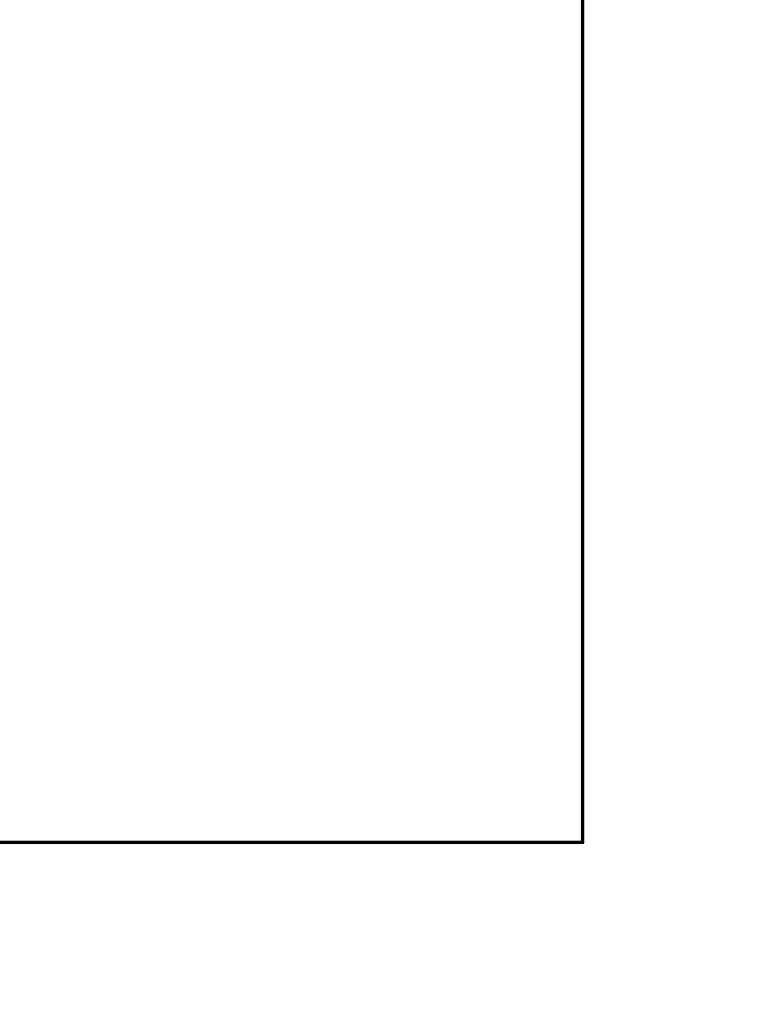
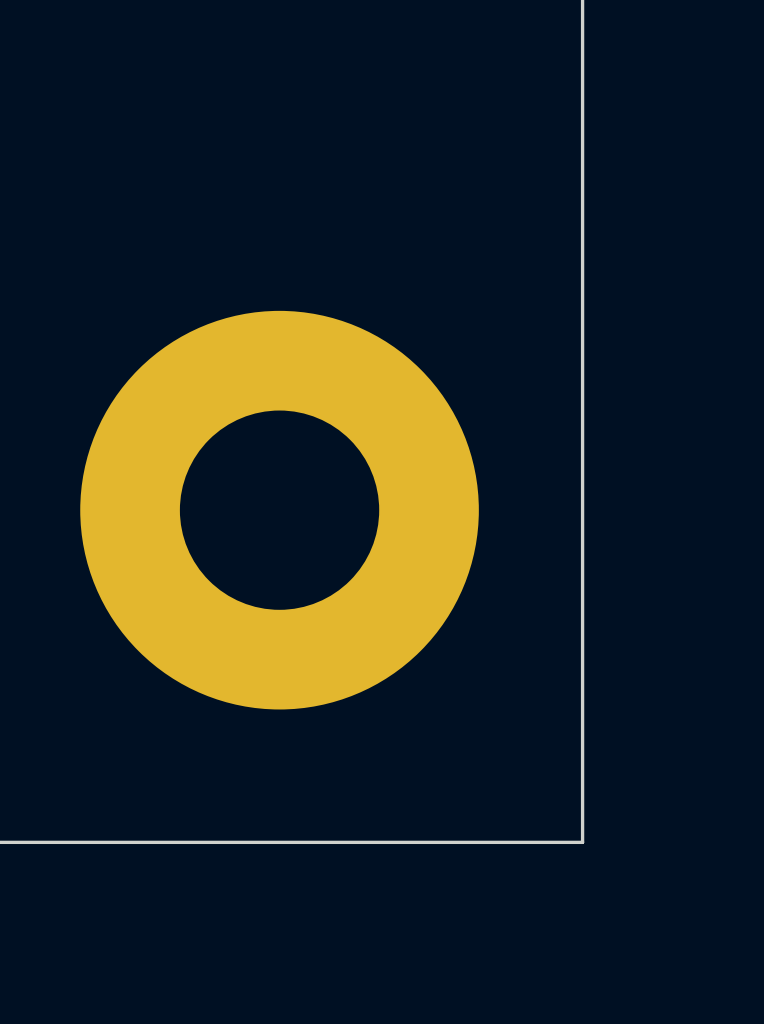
part: none -> (279, 510)

